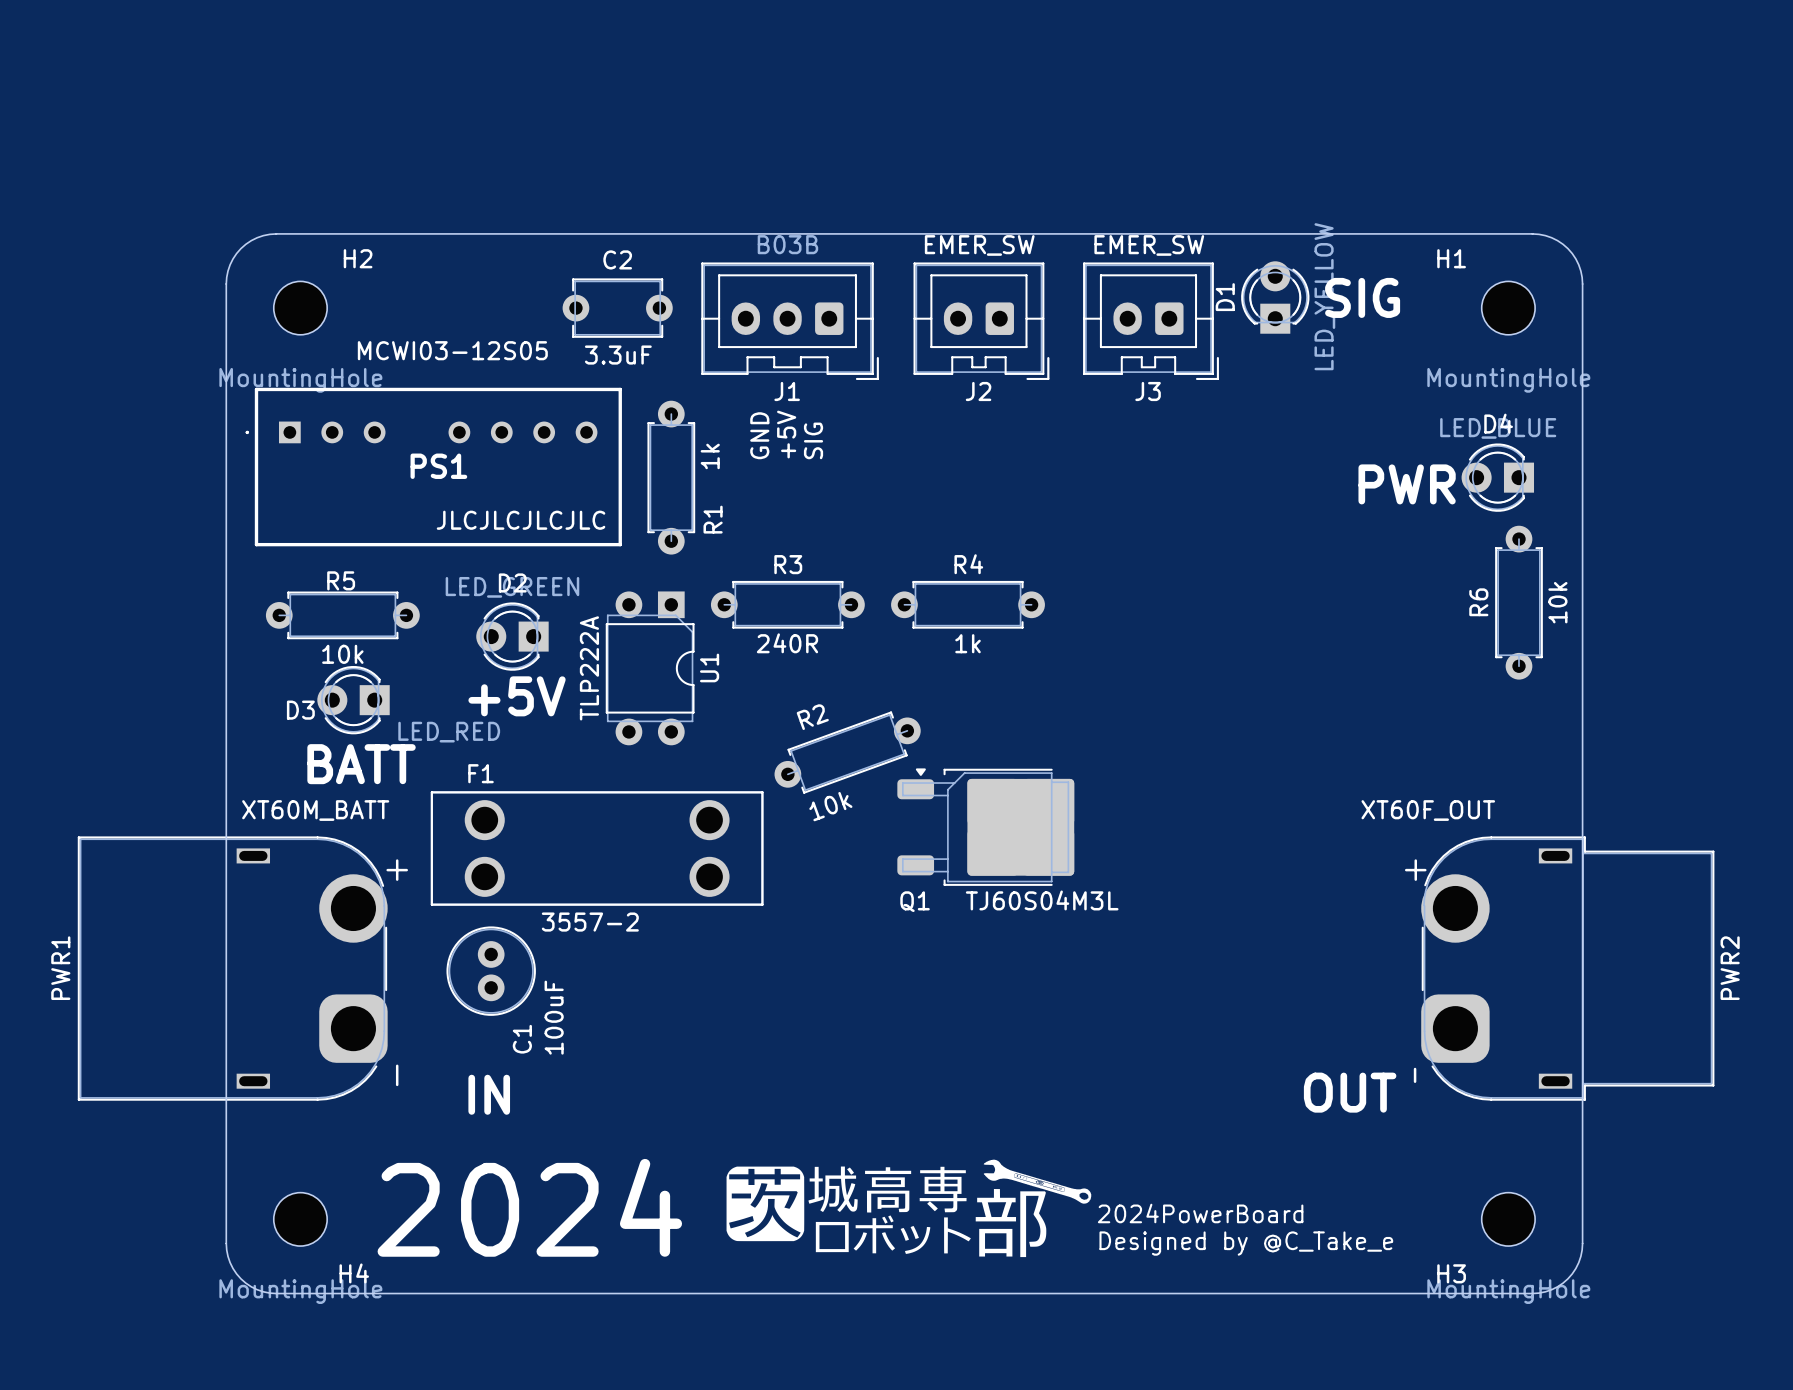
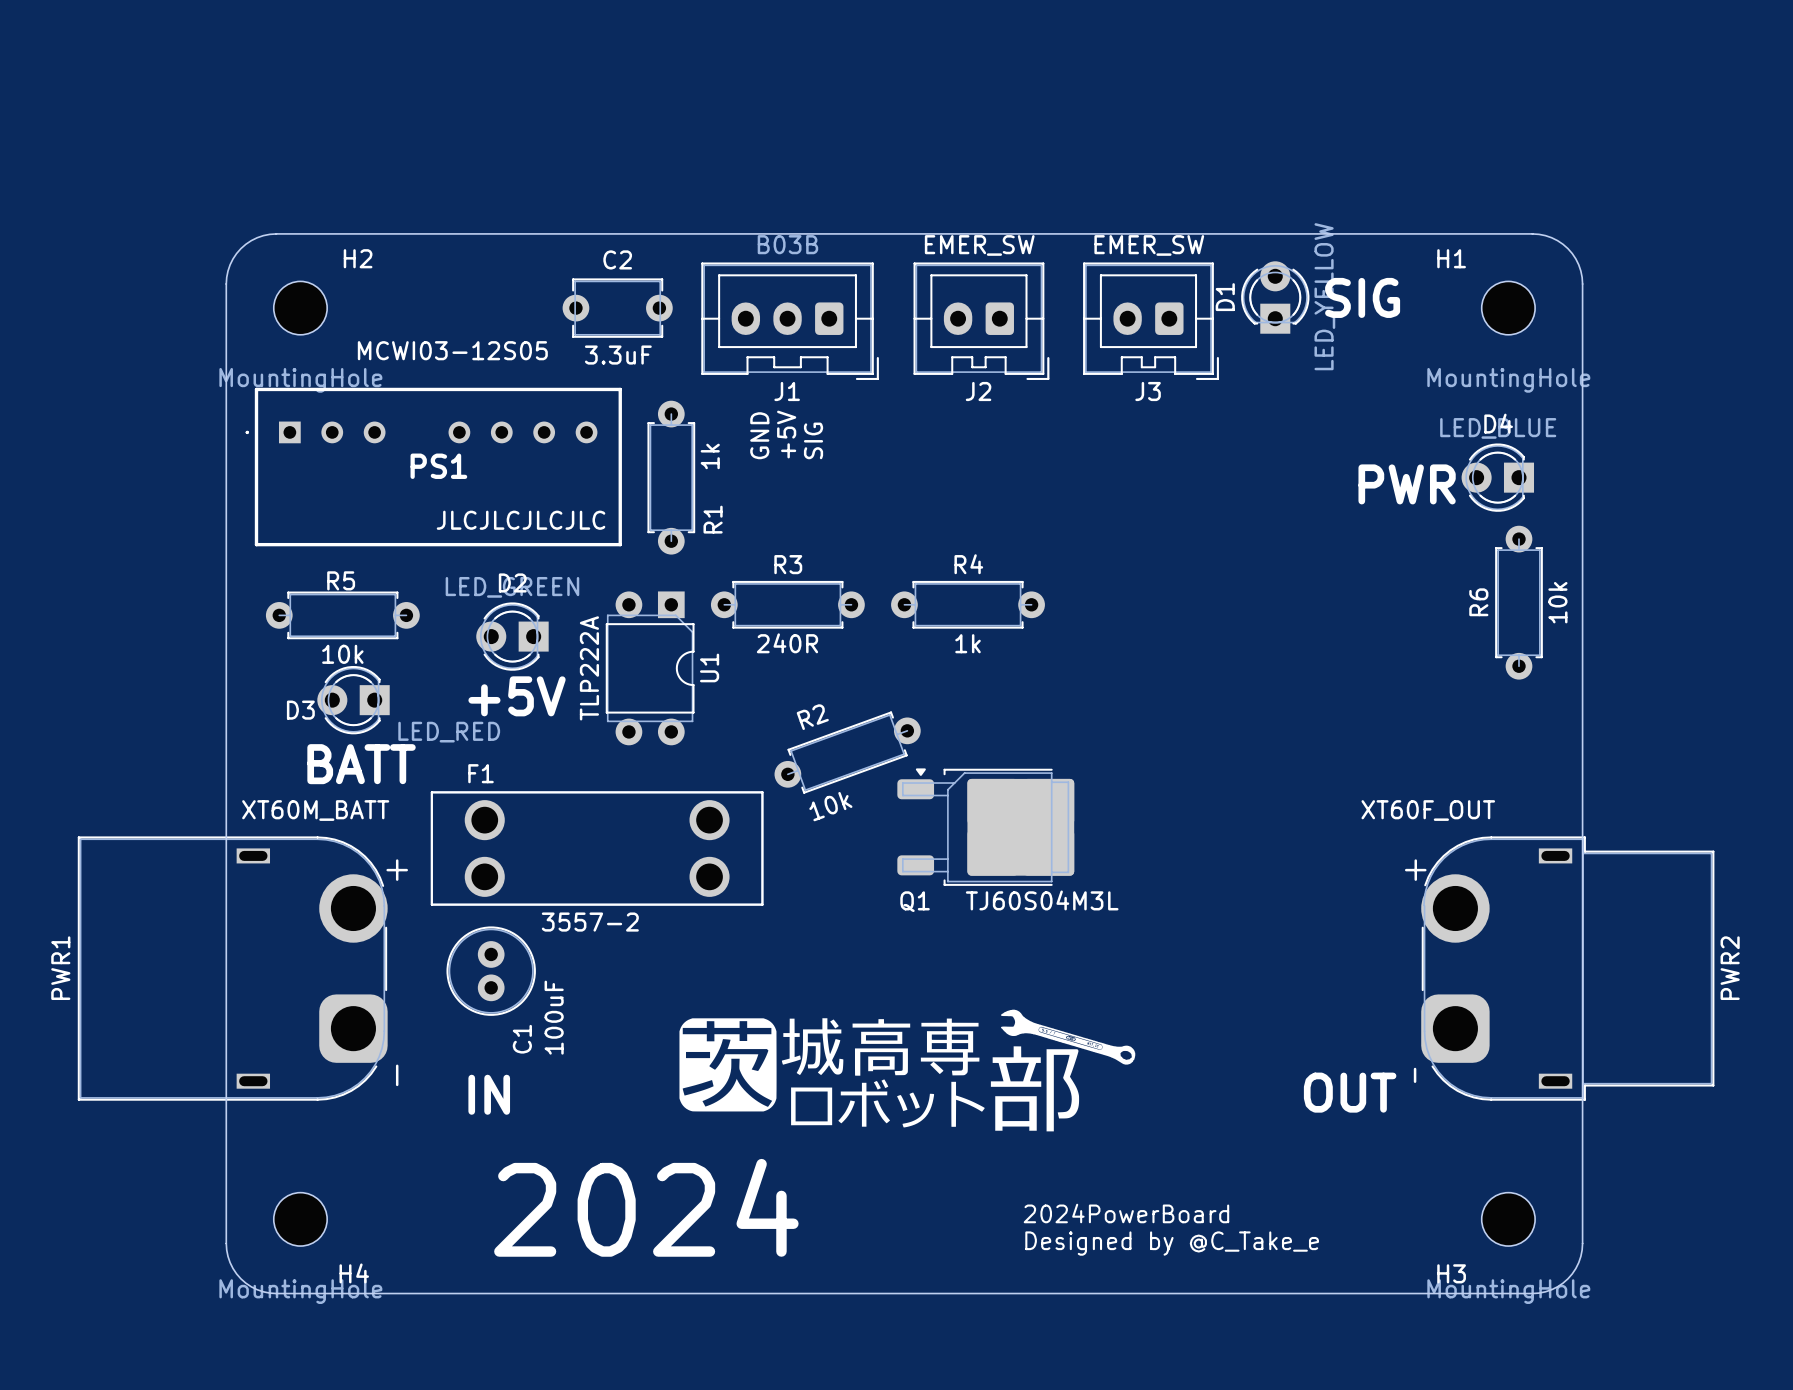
drawing: none -> [679, 1009, 1136, 1132]
drawing: [726, 1159, 1092, 1258] -> none
text position: 2024 (529, 1207) -> 2024 (646, 1207)
text position: 2024PowerBoard (1200, 1213) -> 2024PowerBoard (1126, 1213)
text position: Designed by @C_Take_e (1246, 1243) -> Designed by @C_Take_e (1172, 1243)

